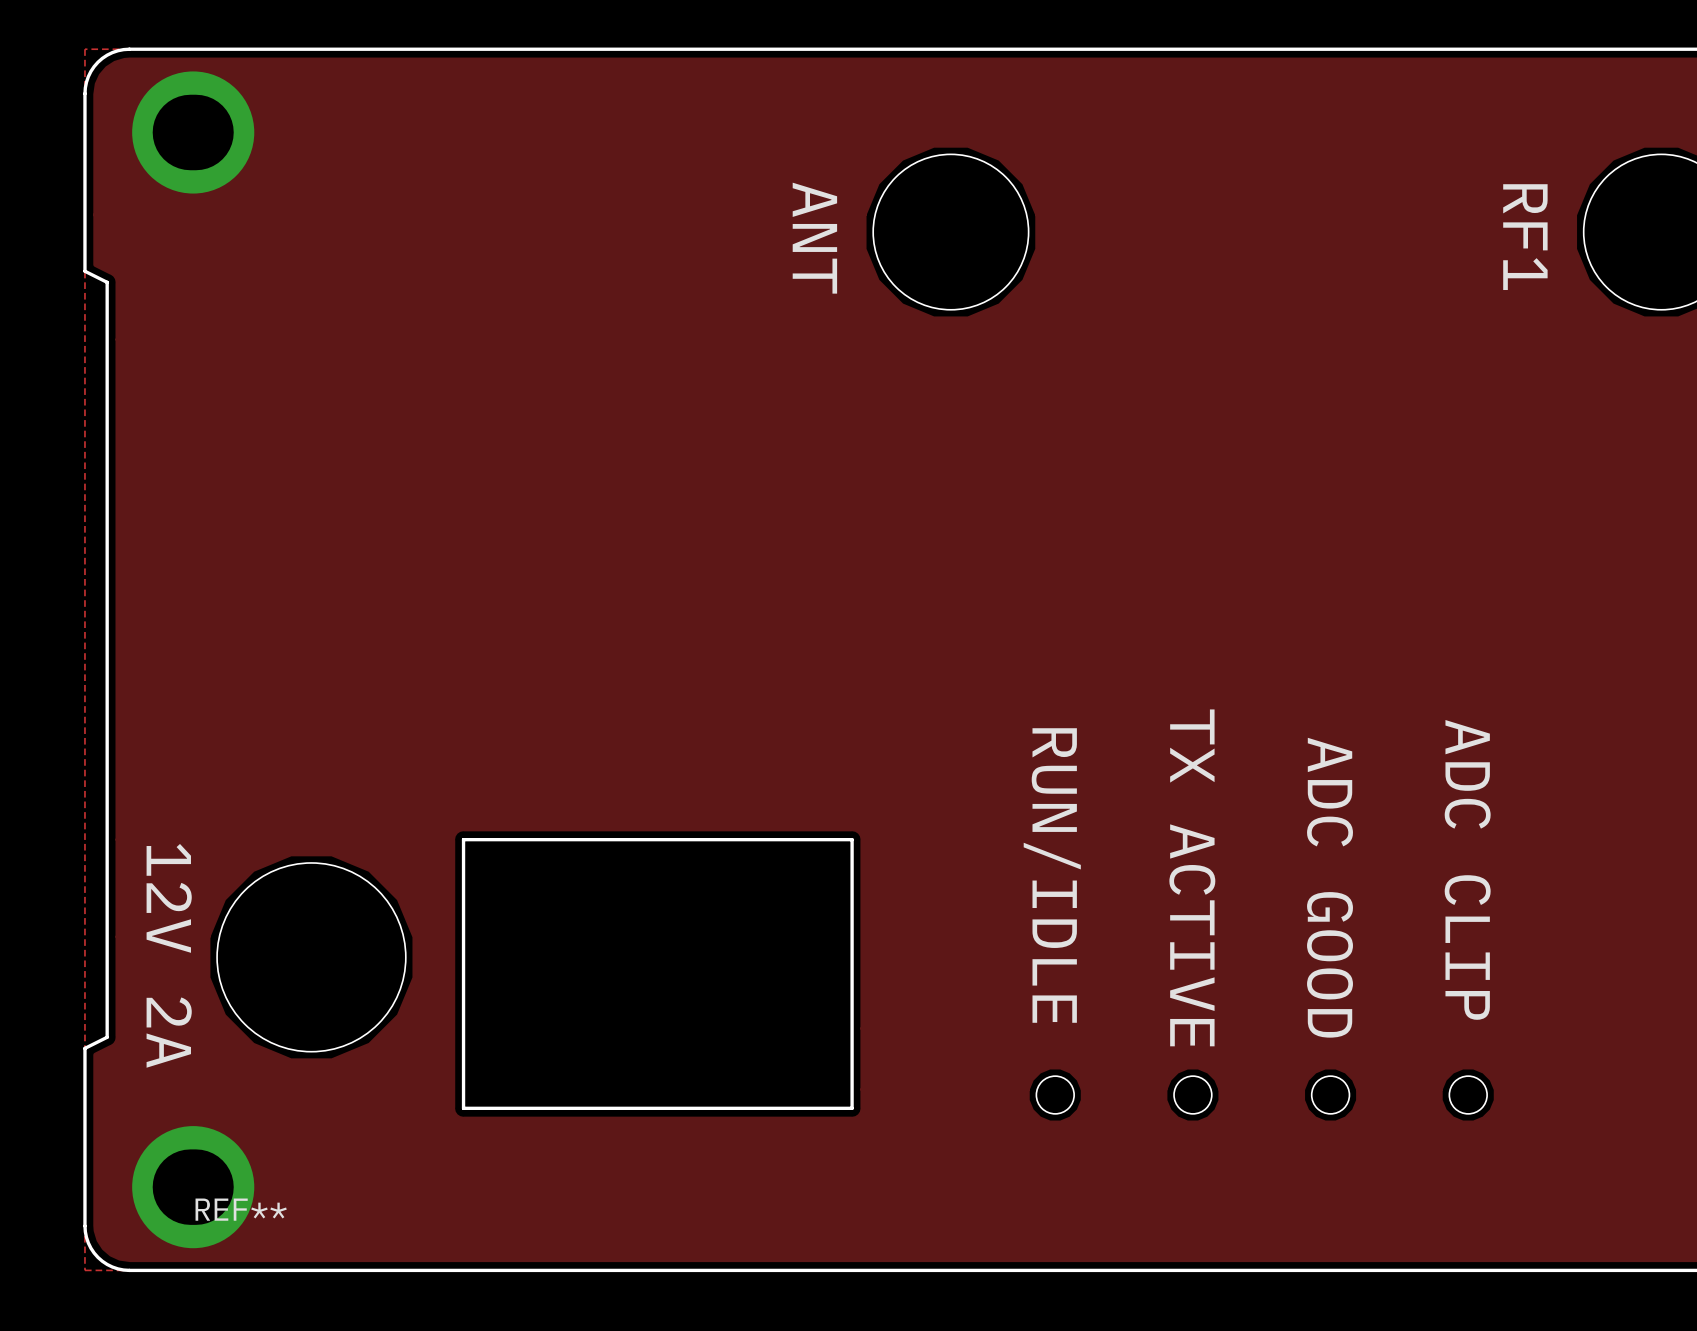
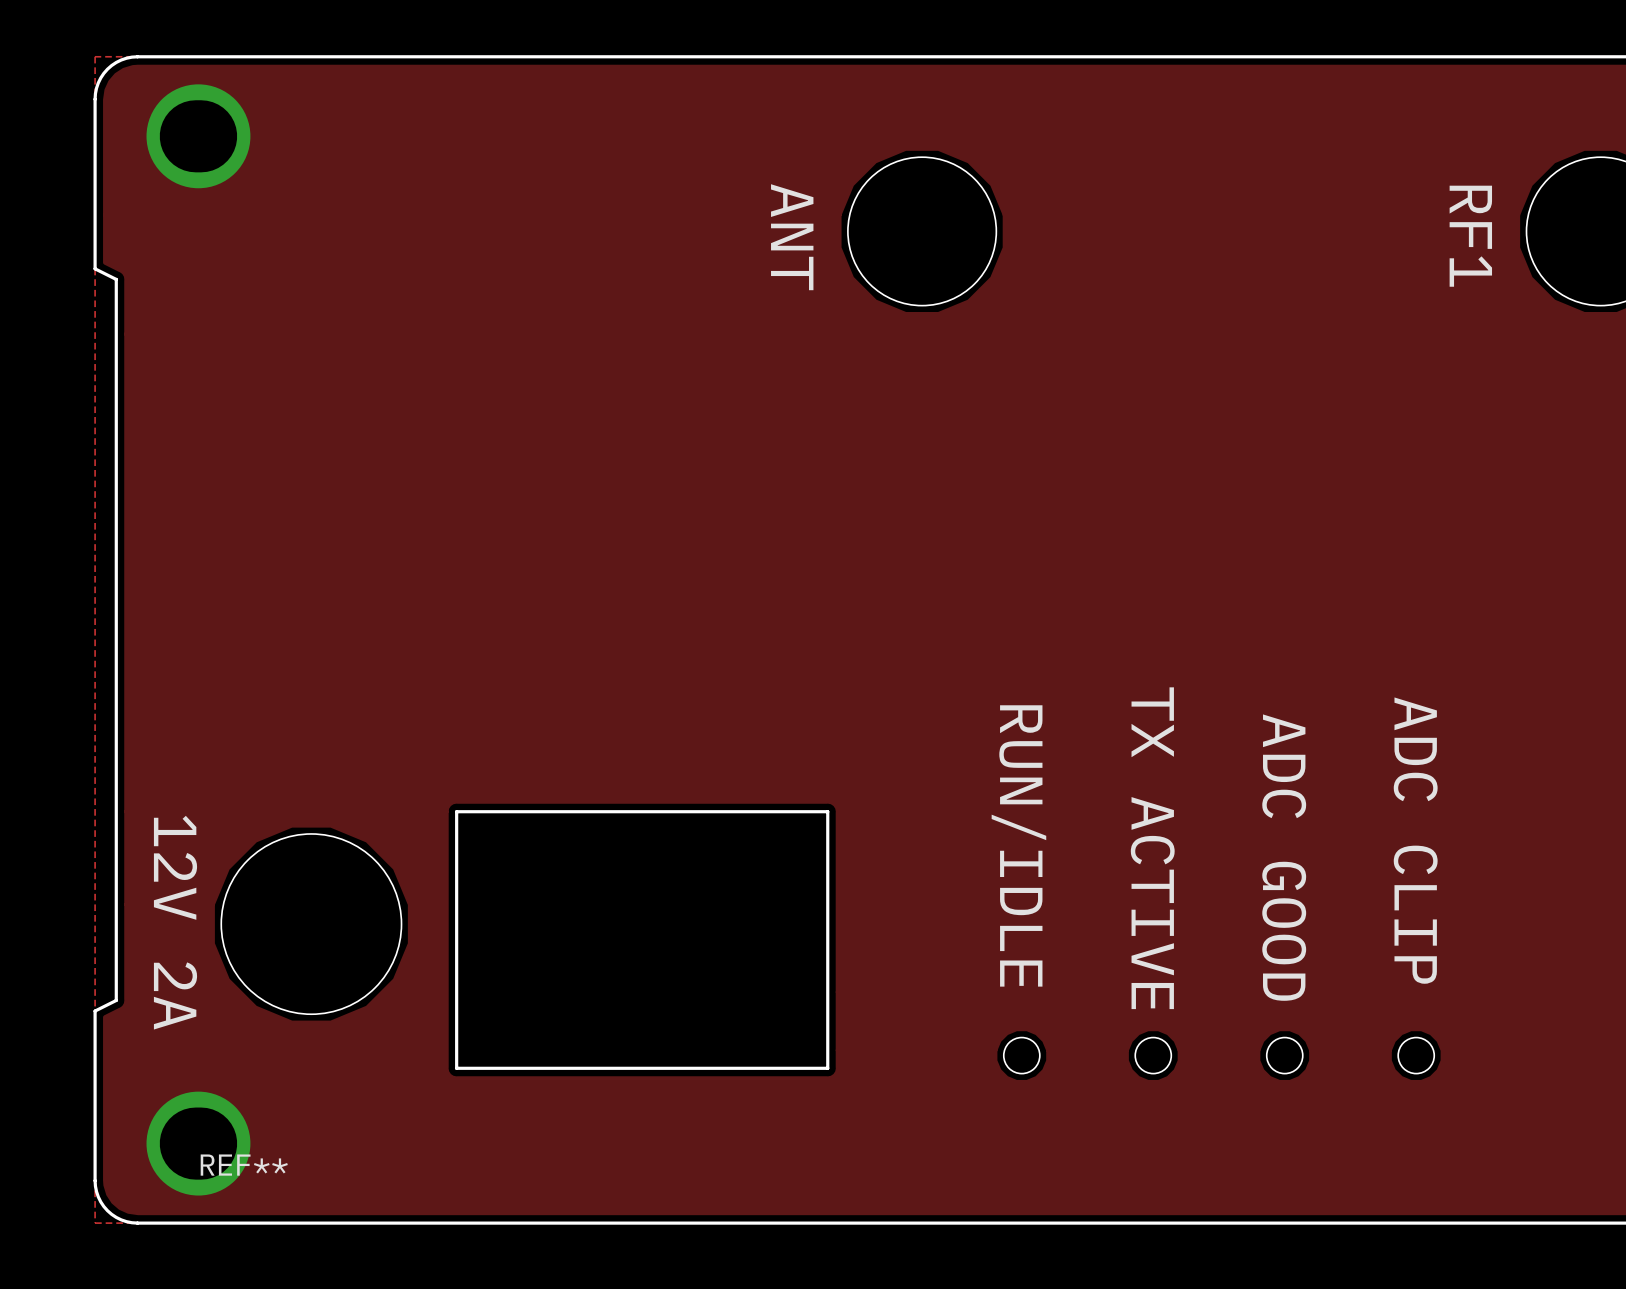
part footprint: [132, 71, 255, 194] -> [146, 84, 251, 189]
part footprint: [132, 1126, 255, 1249] -> [146, 1091, 251, 1196]

